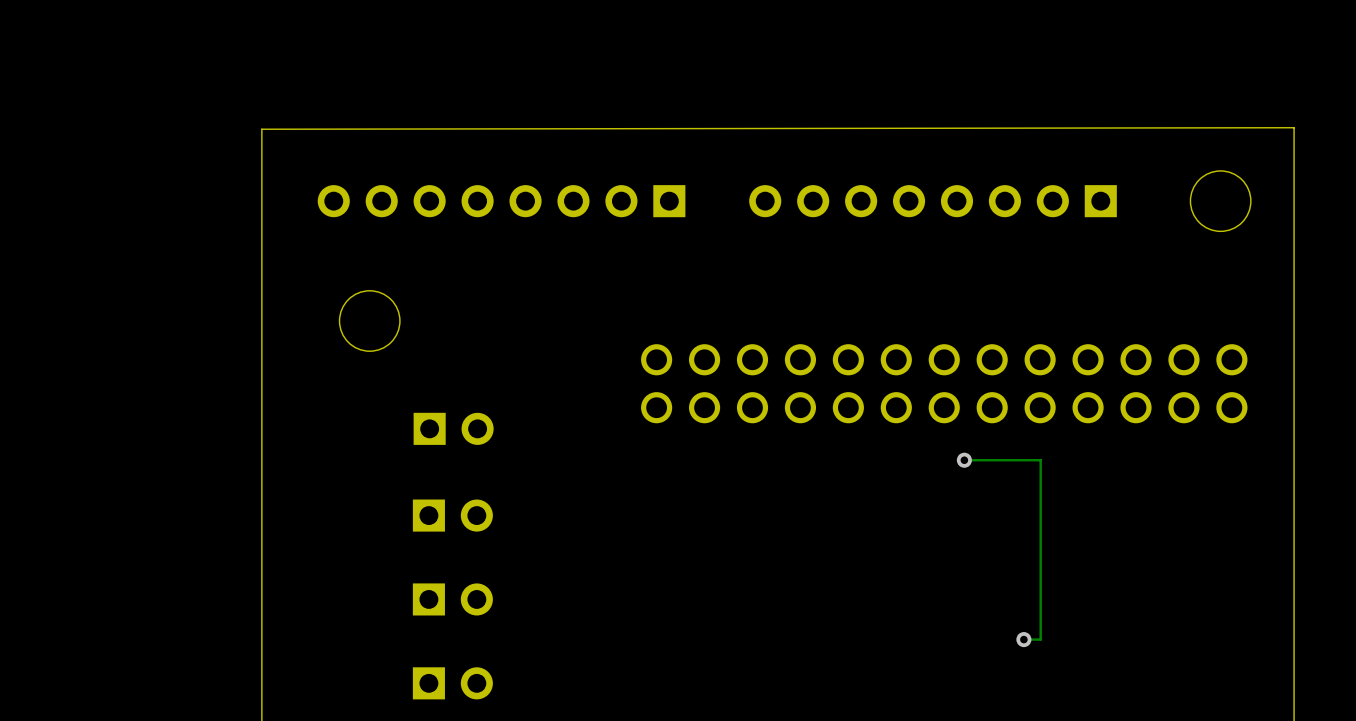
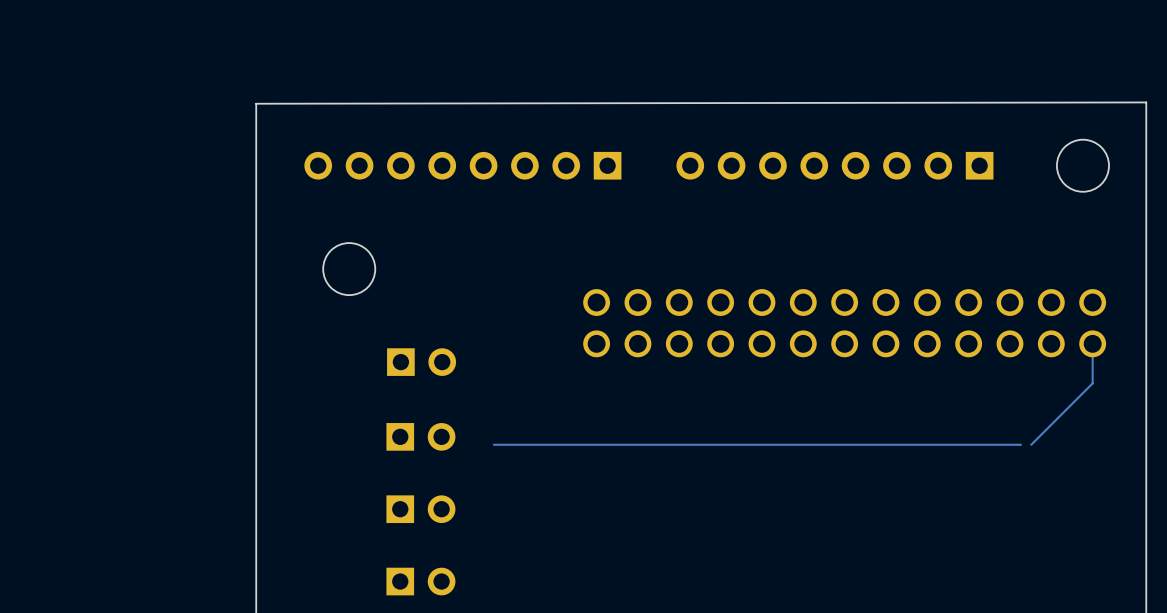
track: none -> (1092, 343) (1092, 383) (1031, 444)
track: (964, 460) (1040, 460) (1040, 639) (1023, 639) -> none
via: (964, 460) -> none
track: none -> (1020, 444) (493, 444)
via: (1023, 639) -> none

